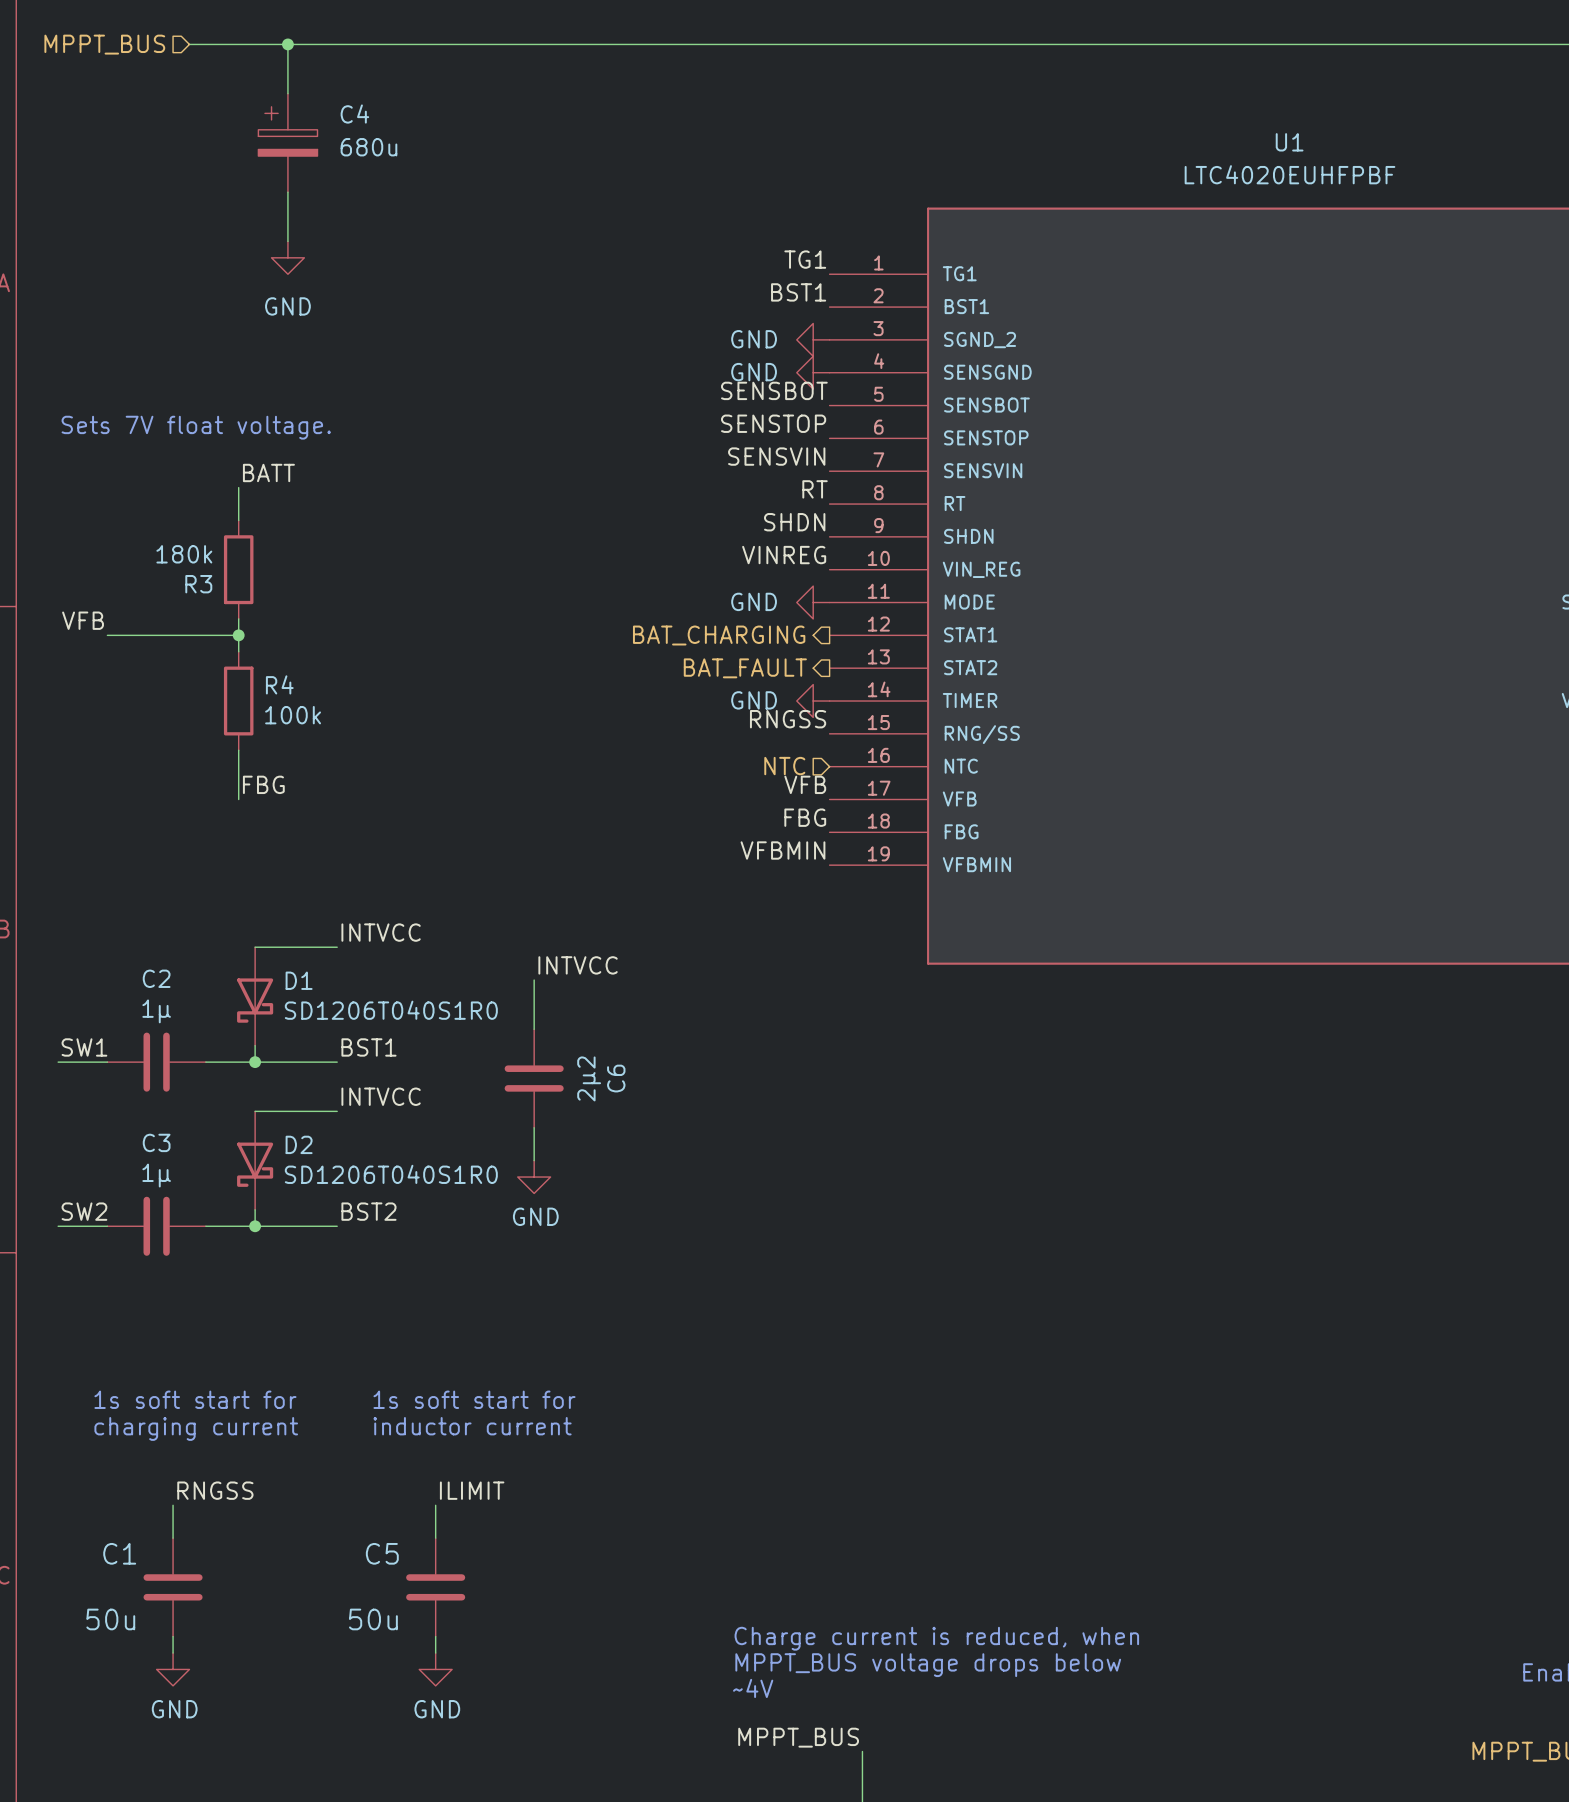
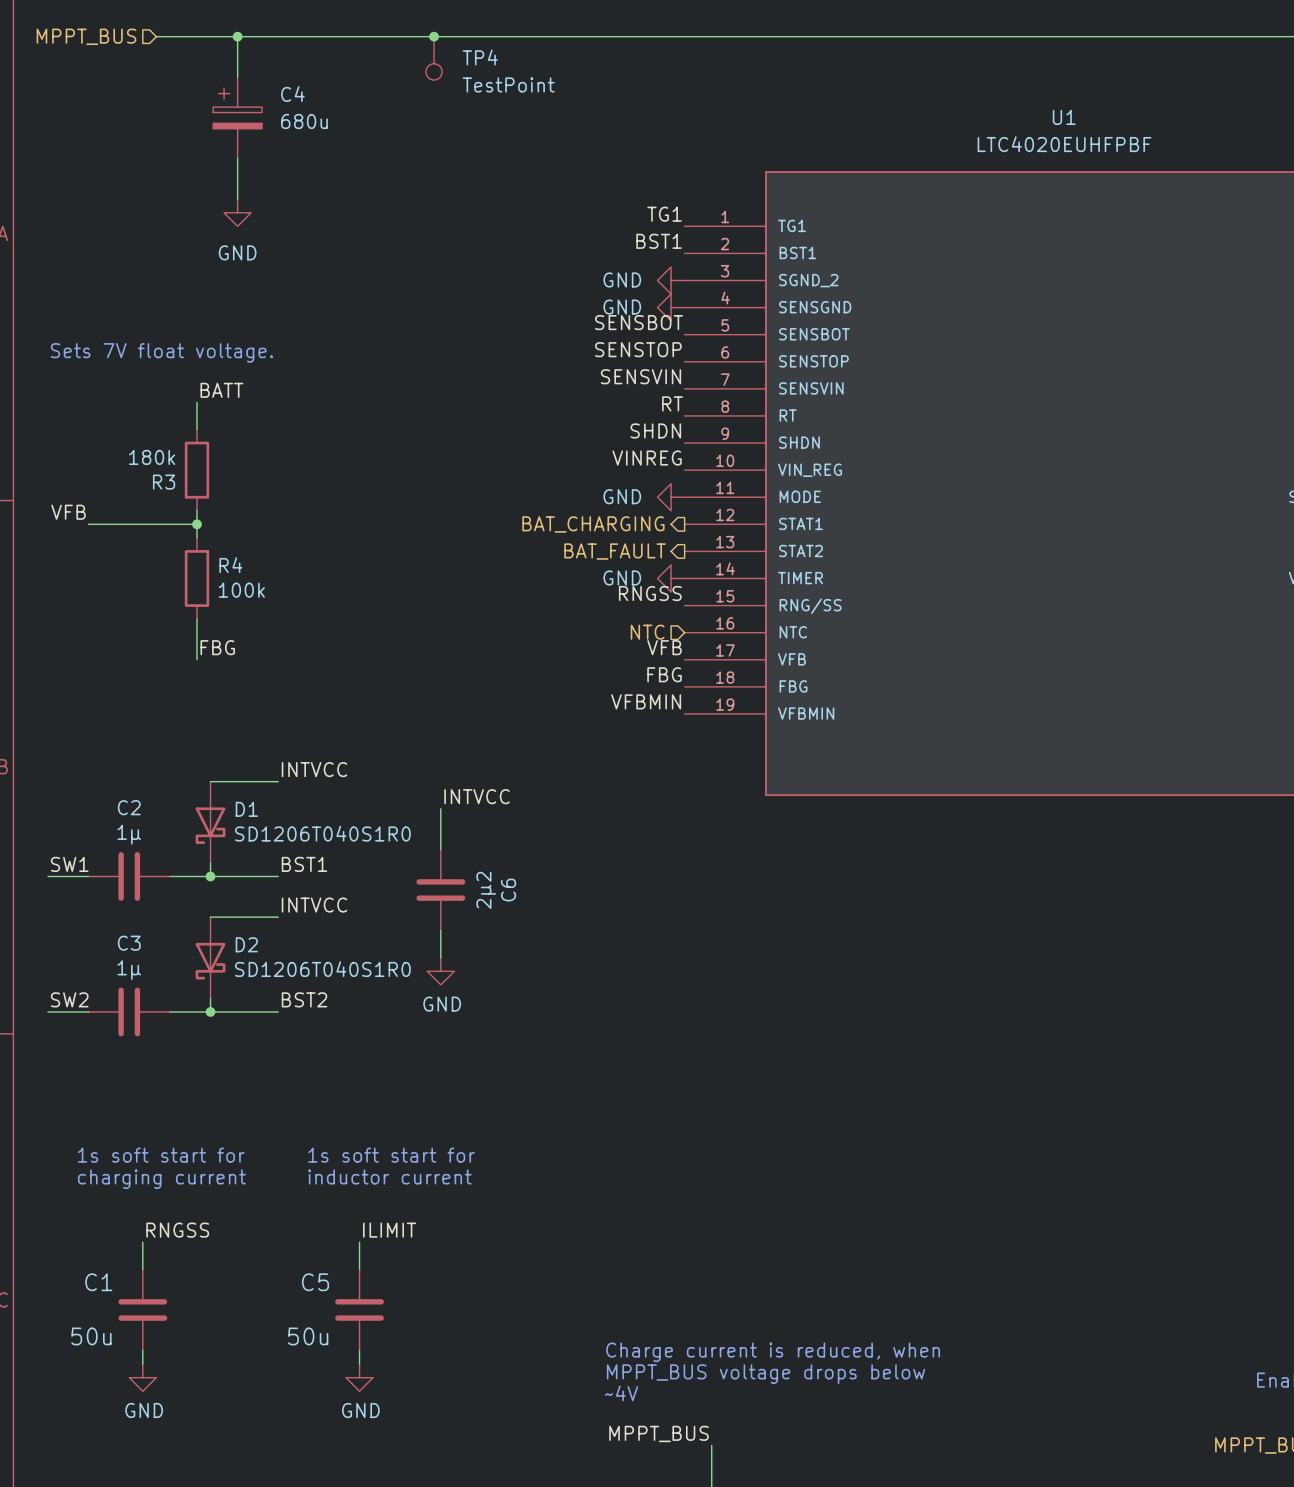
junction: none -> (434, 36)
TP4: none -> TestPoint (434, 58)

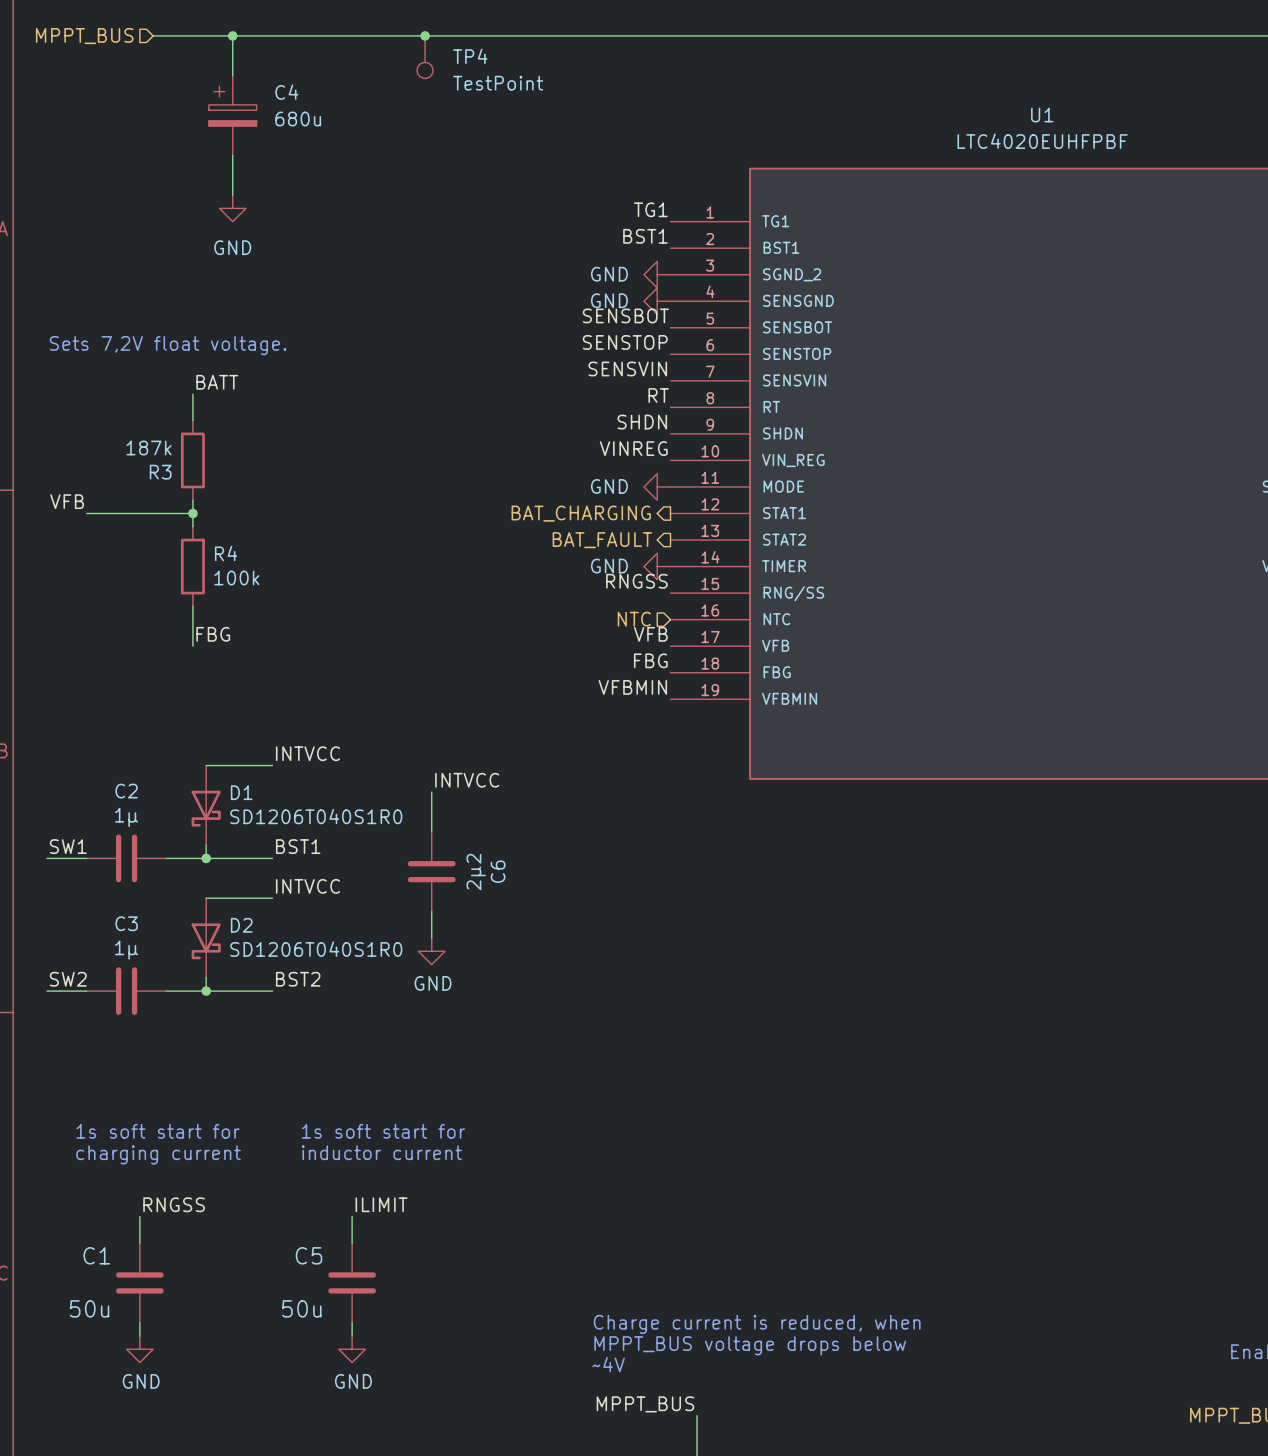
text: Sets 7V float voltage. (161, 352) -> Sets 7,2V float voltage. (168, 345)
R3 value: 180k (152, 457) -> 187k (148, 448)

